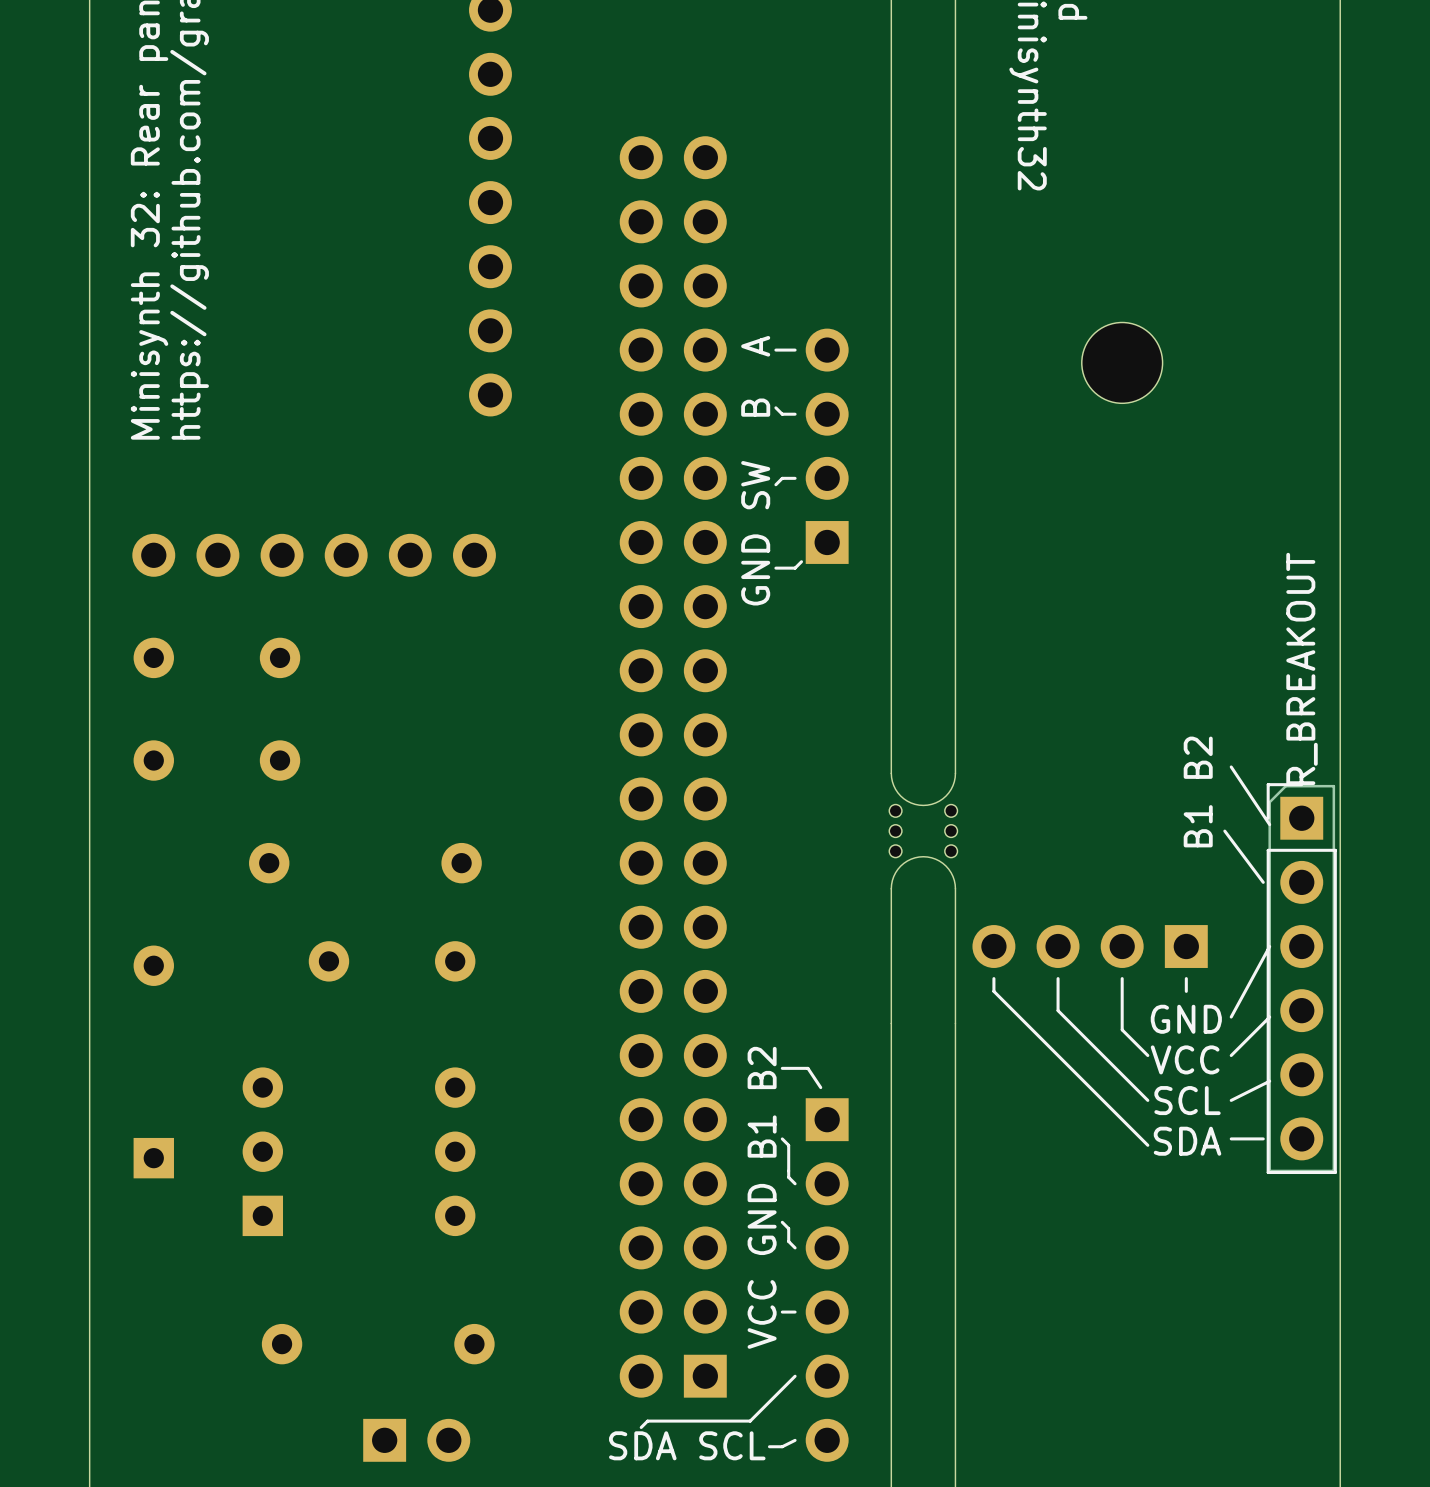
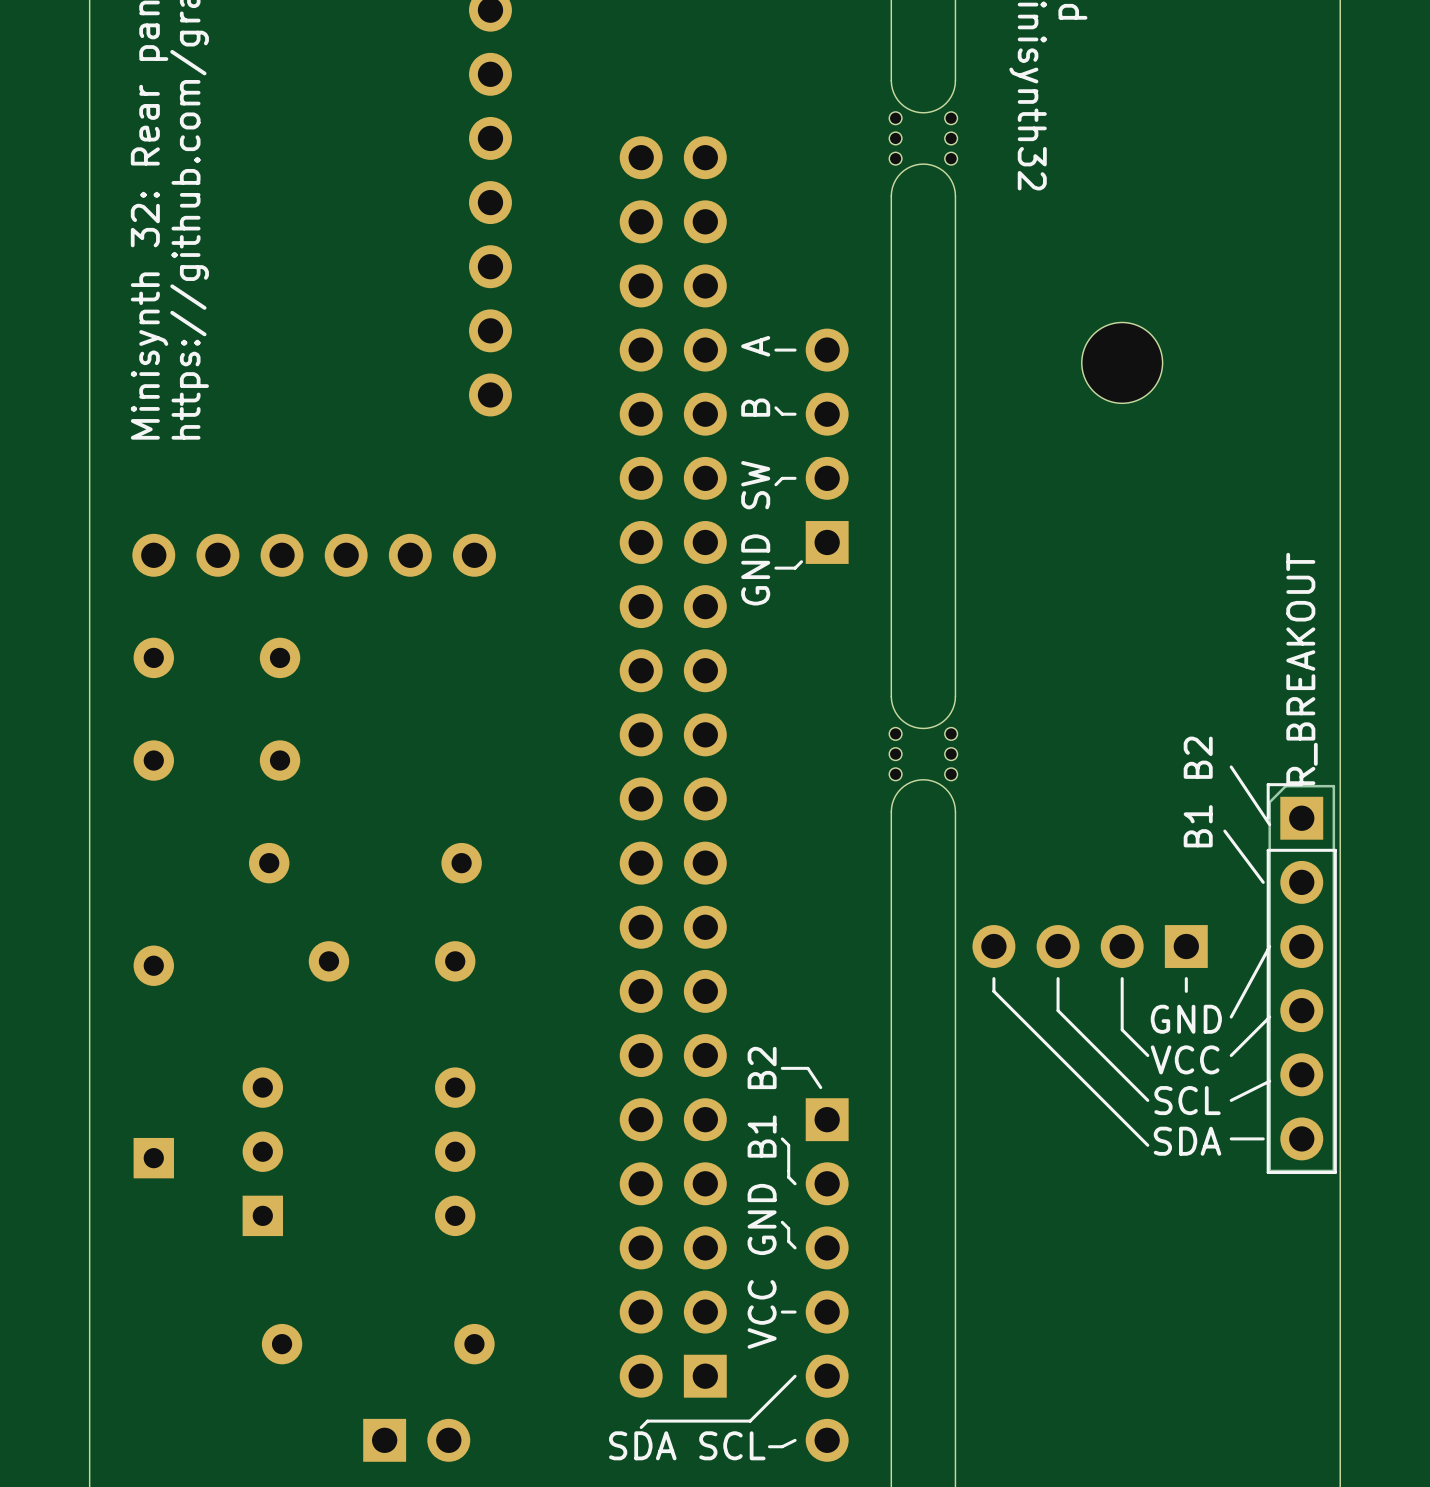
board edge: (891, 80) (891, 196) -> (955, 196) (953, 183) (946, 173) (935, 166) (923, 164) (911, 166) (900, 173) (893, 183) (891, 196)
board edge: (955, 80) (955, 196) -> (955, 80) (953, 92) (946, 103) (935, 110) (923, 112) (911, 110) (900, 103) (893, 92) (891, 80)
part: none -> (923, 138)
board edge: (955, 696) (954, 781) (951, 789) (942, 798) (935, 802) (923, 805) (915, 804) (903, 798) (895, 789) (892, 781) (891, 696) -> (955, 696) (953, 708) (946, 719) (935, 726) (923, 728) (911, 726) (900, 719) (893, 708) (891, 696)
part position: (923, 831) -> (923, 754)
board edge: (955, 888) (953, 876) (946, 866) (935, 859) (923, 856) (911, 859) (900, 866) (893, 876) (891, 888) -> (955, 888) (954, 803) (951, 795) (942, 786) (935, 782) (923, 779) (911, 782) (903, 786) (897, 792) (892, 803) (891, 888)

